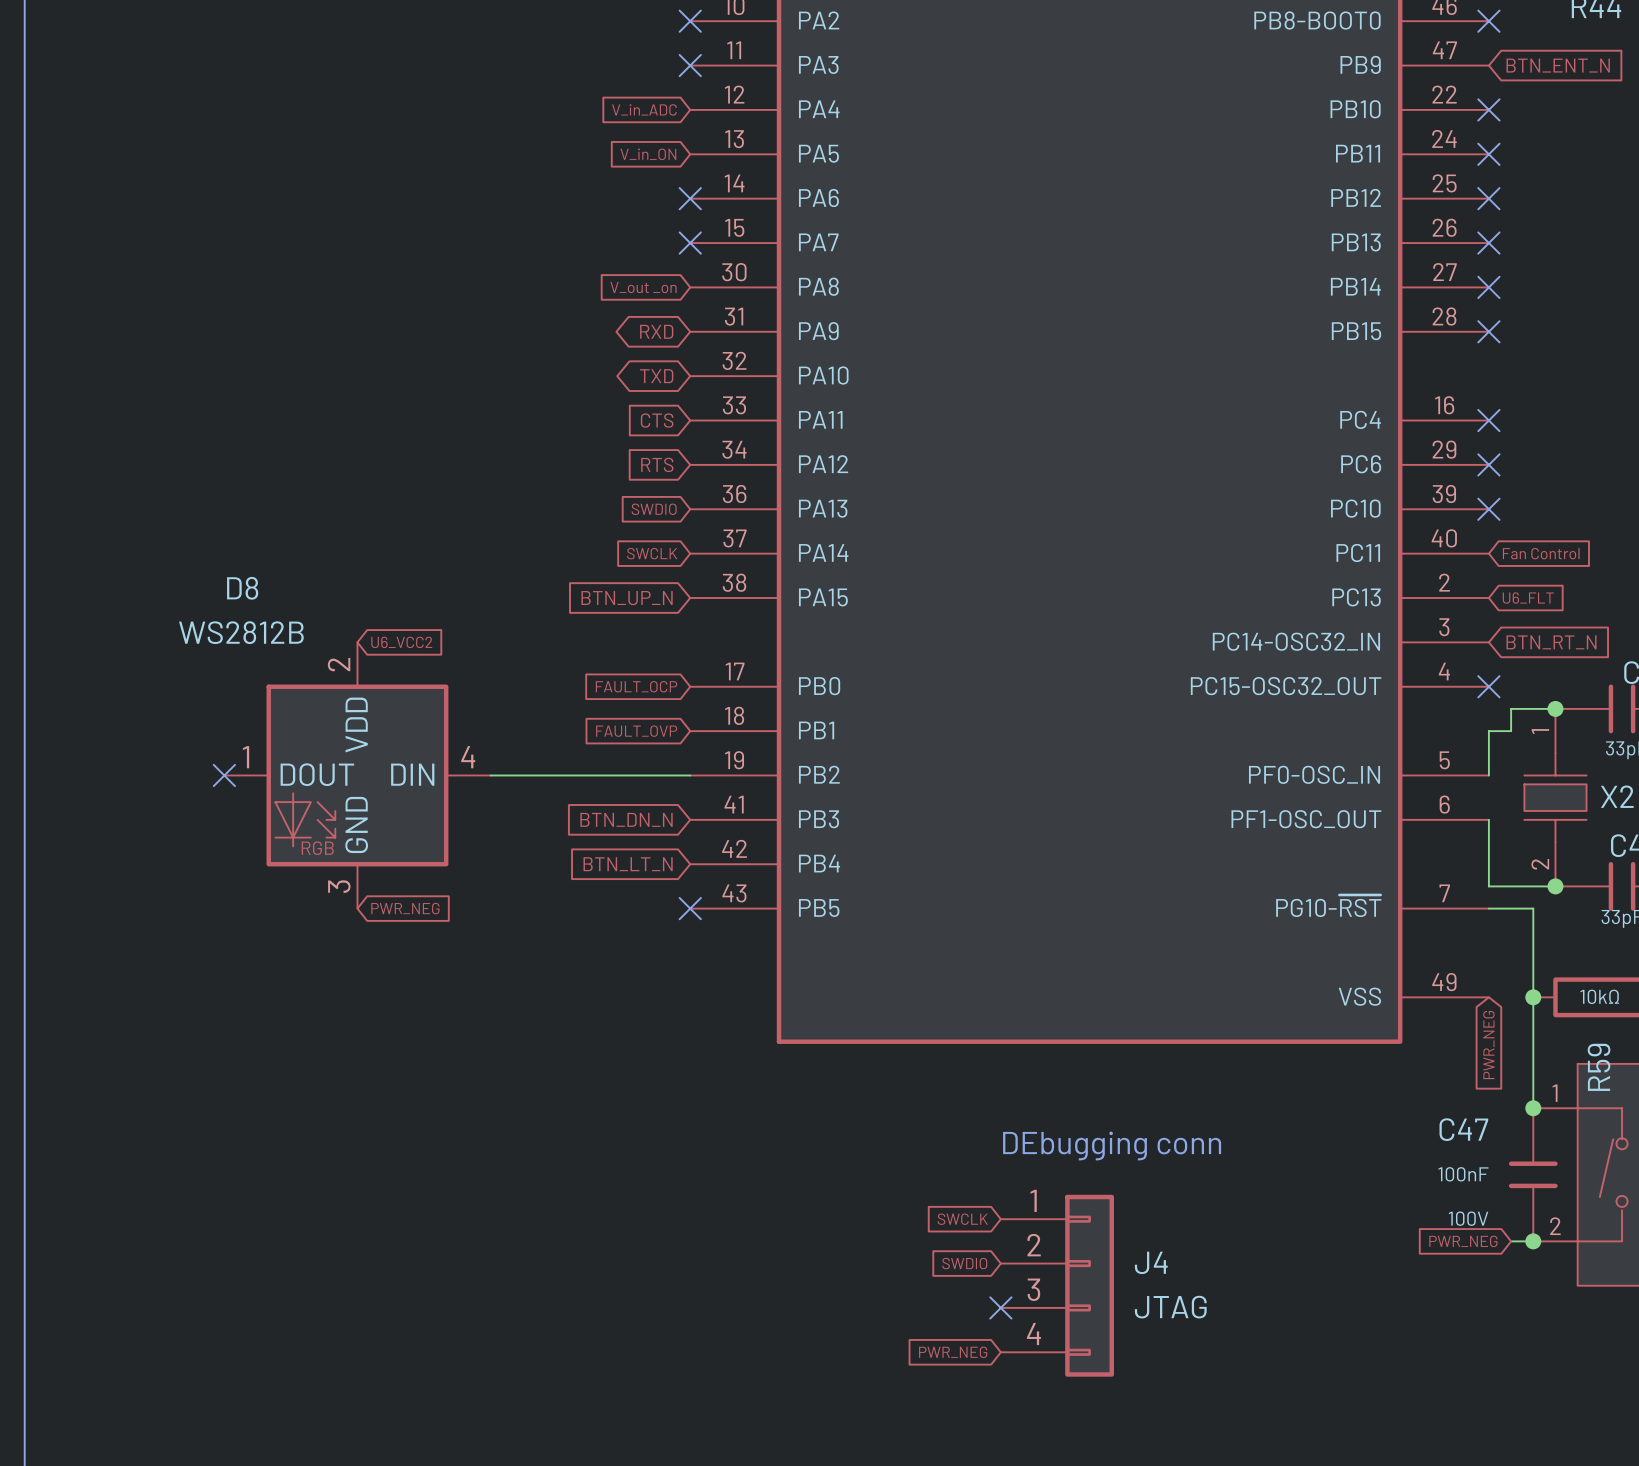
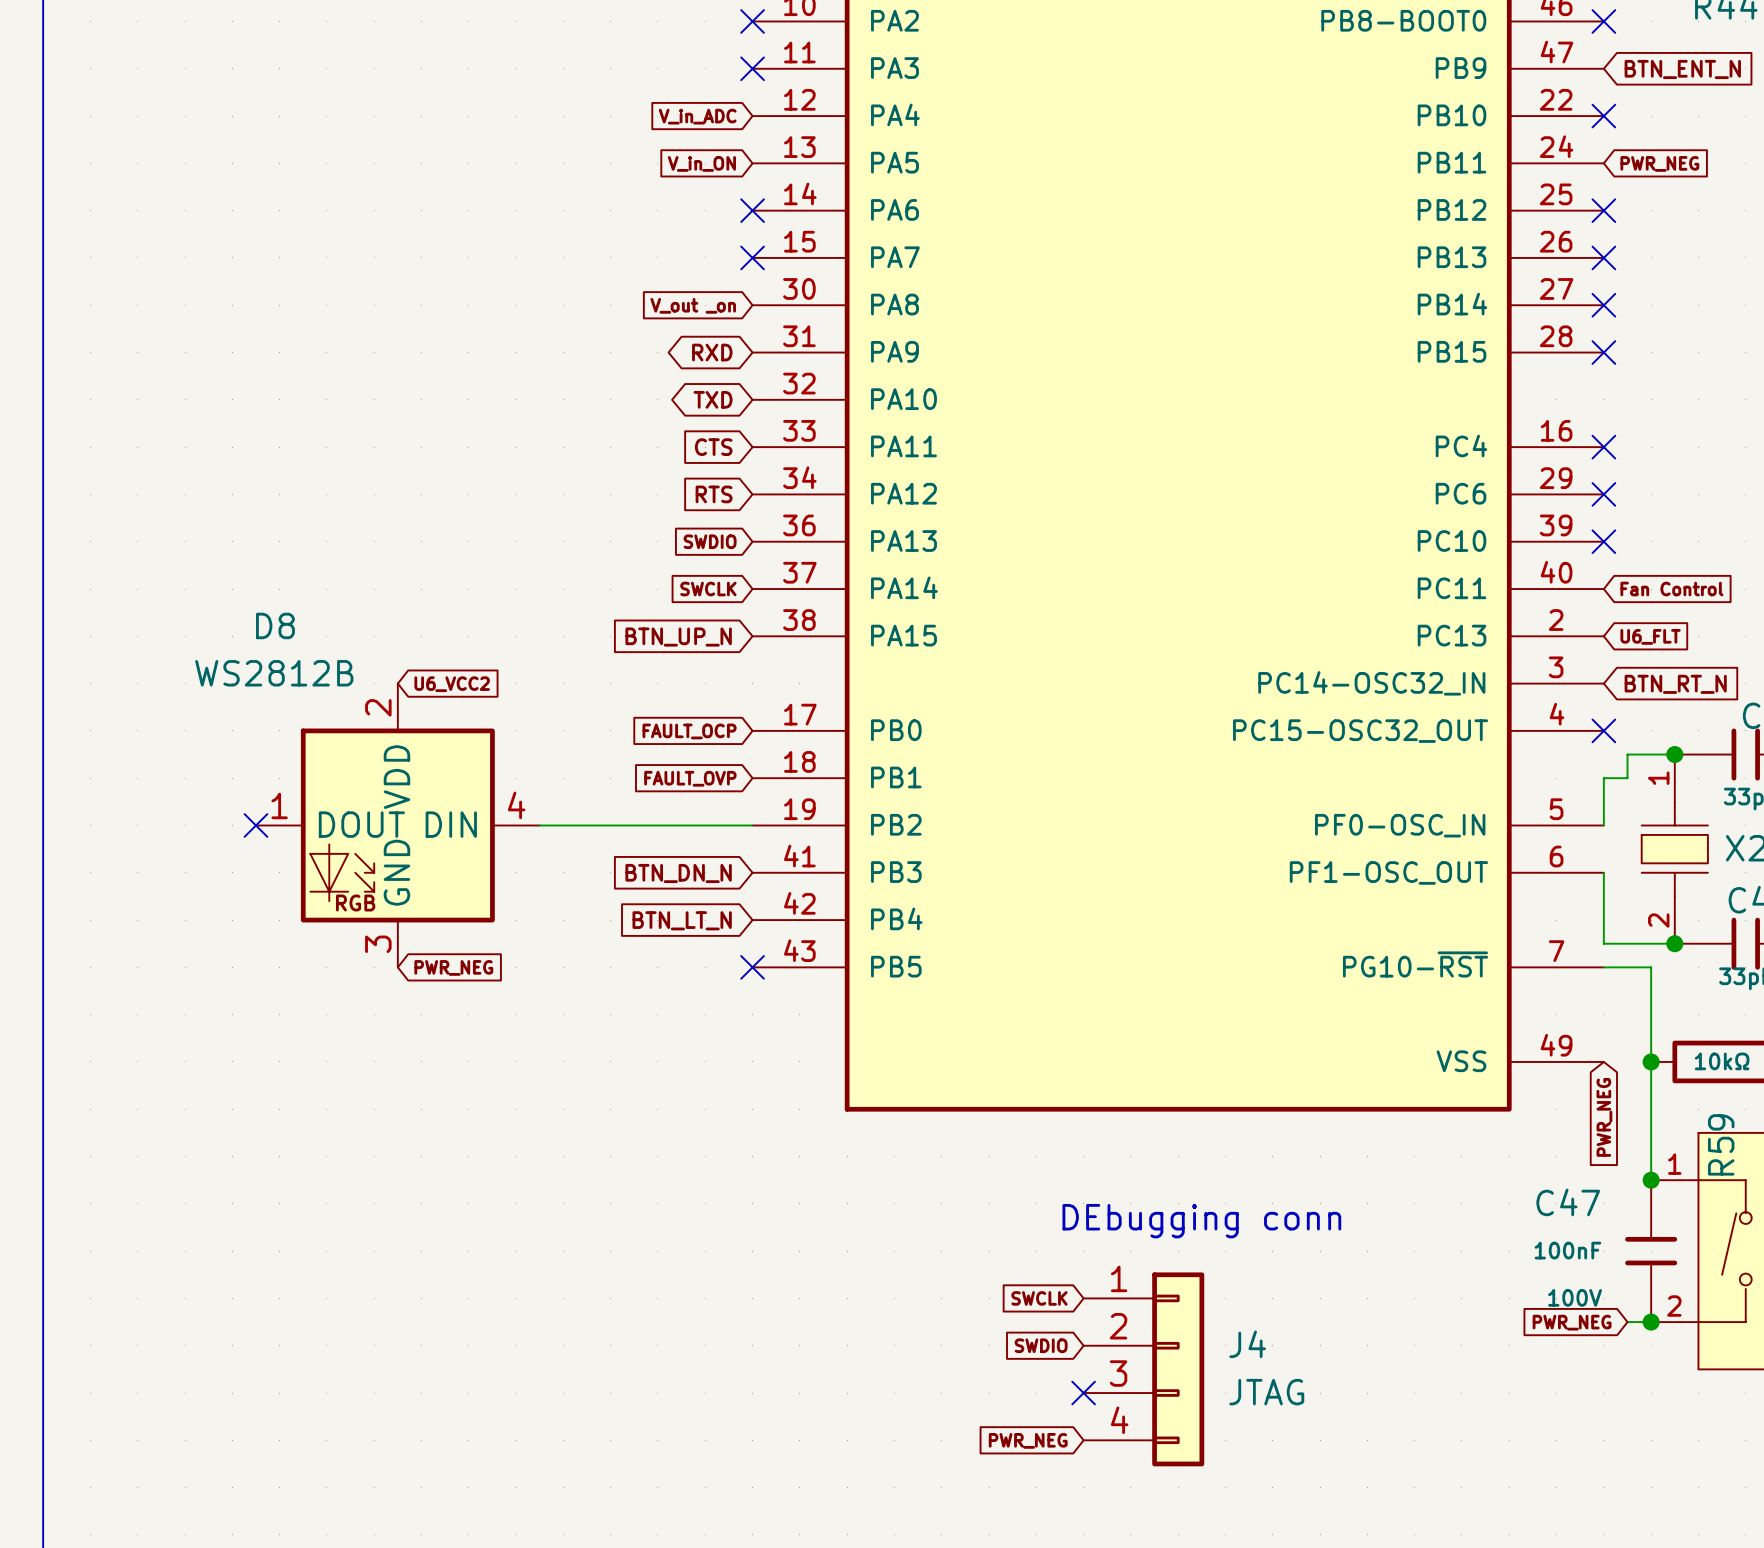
no-connect mark: (1488, 154) -> none
global label: none -> PWR_NEG (1659, 163)

